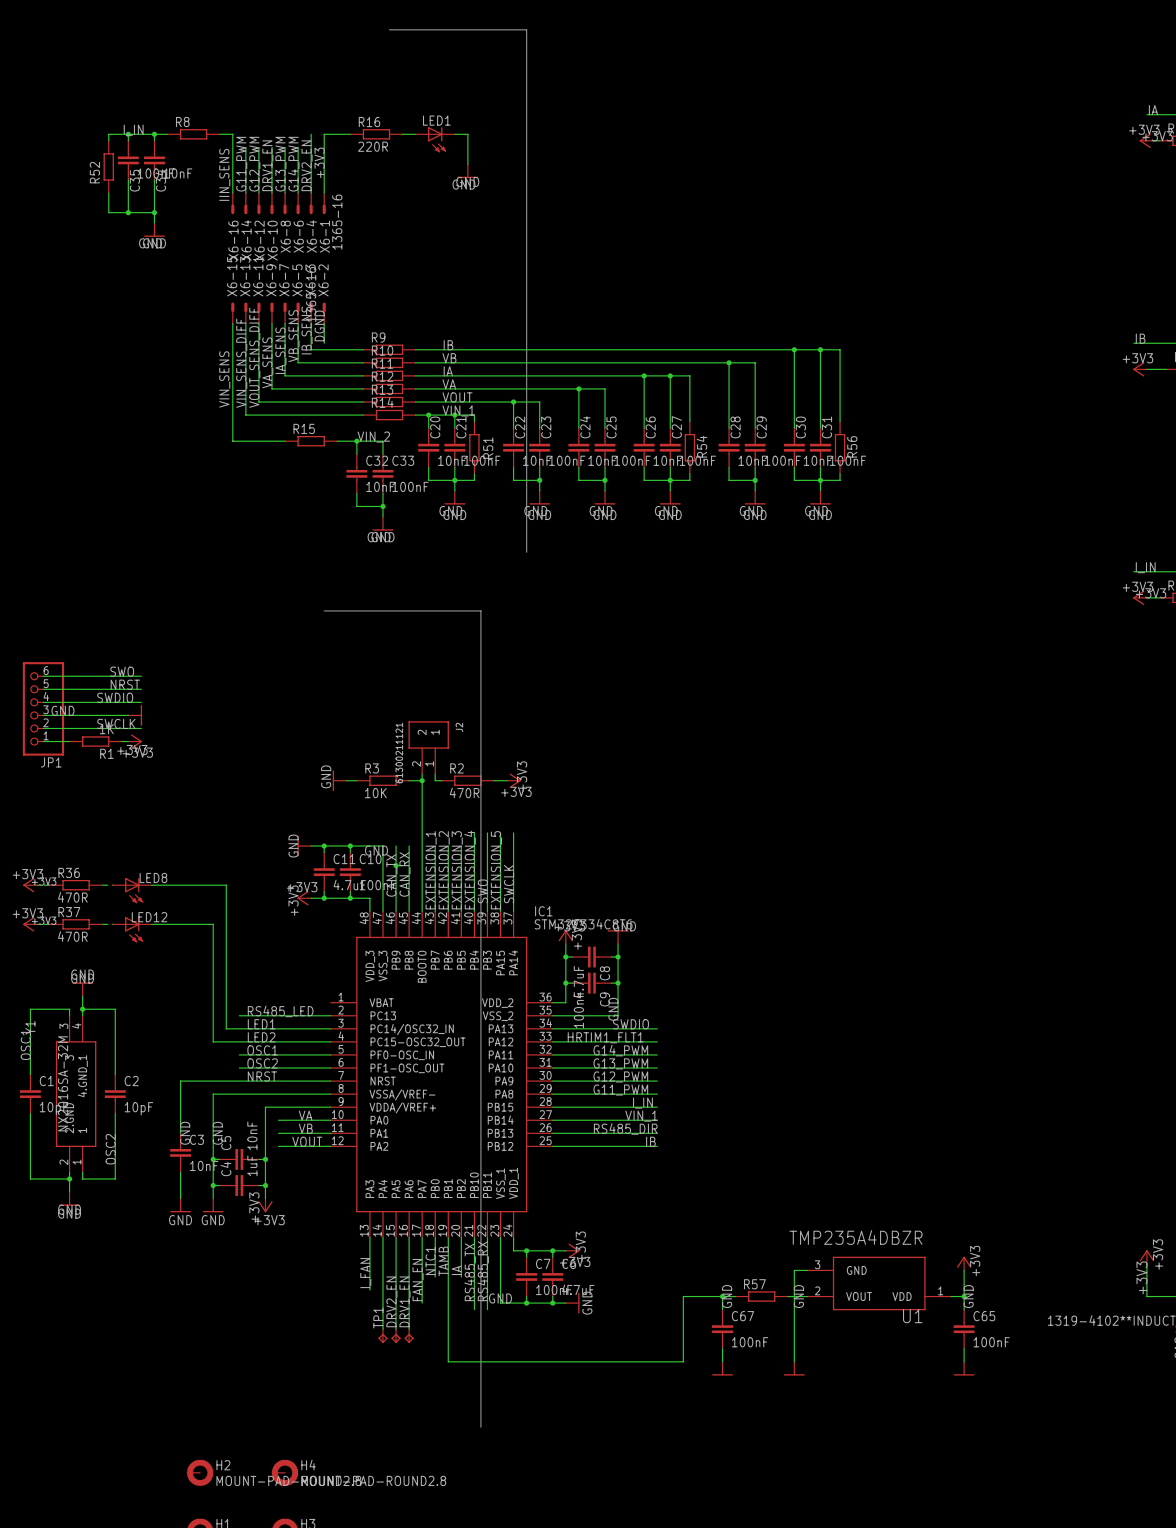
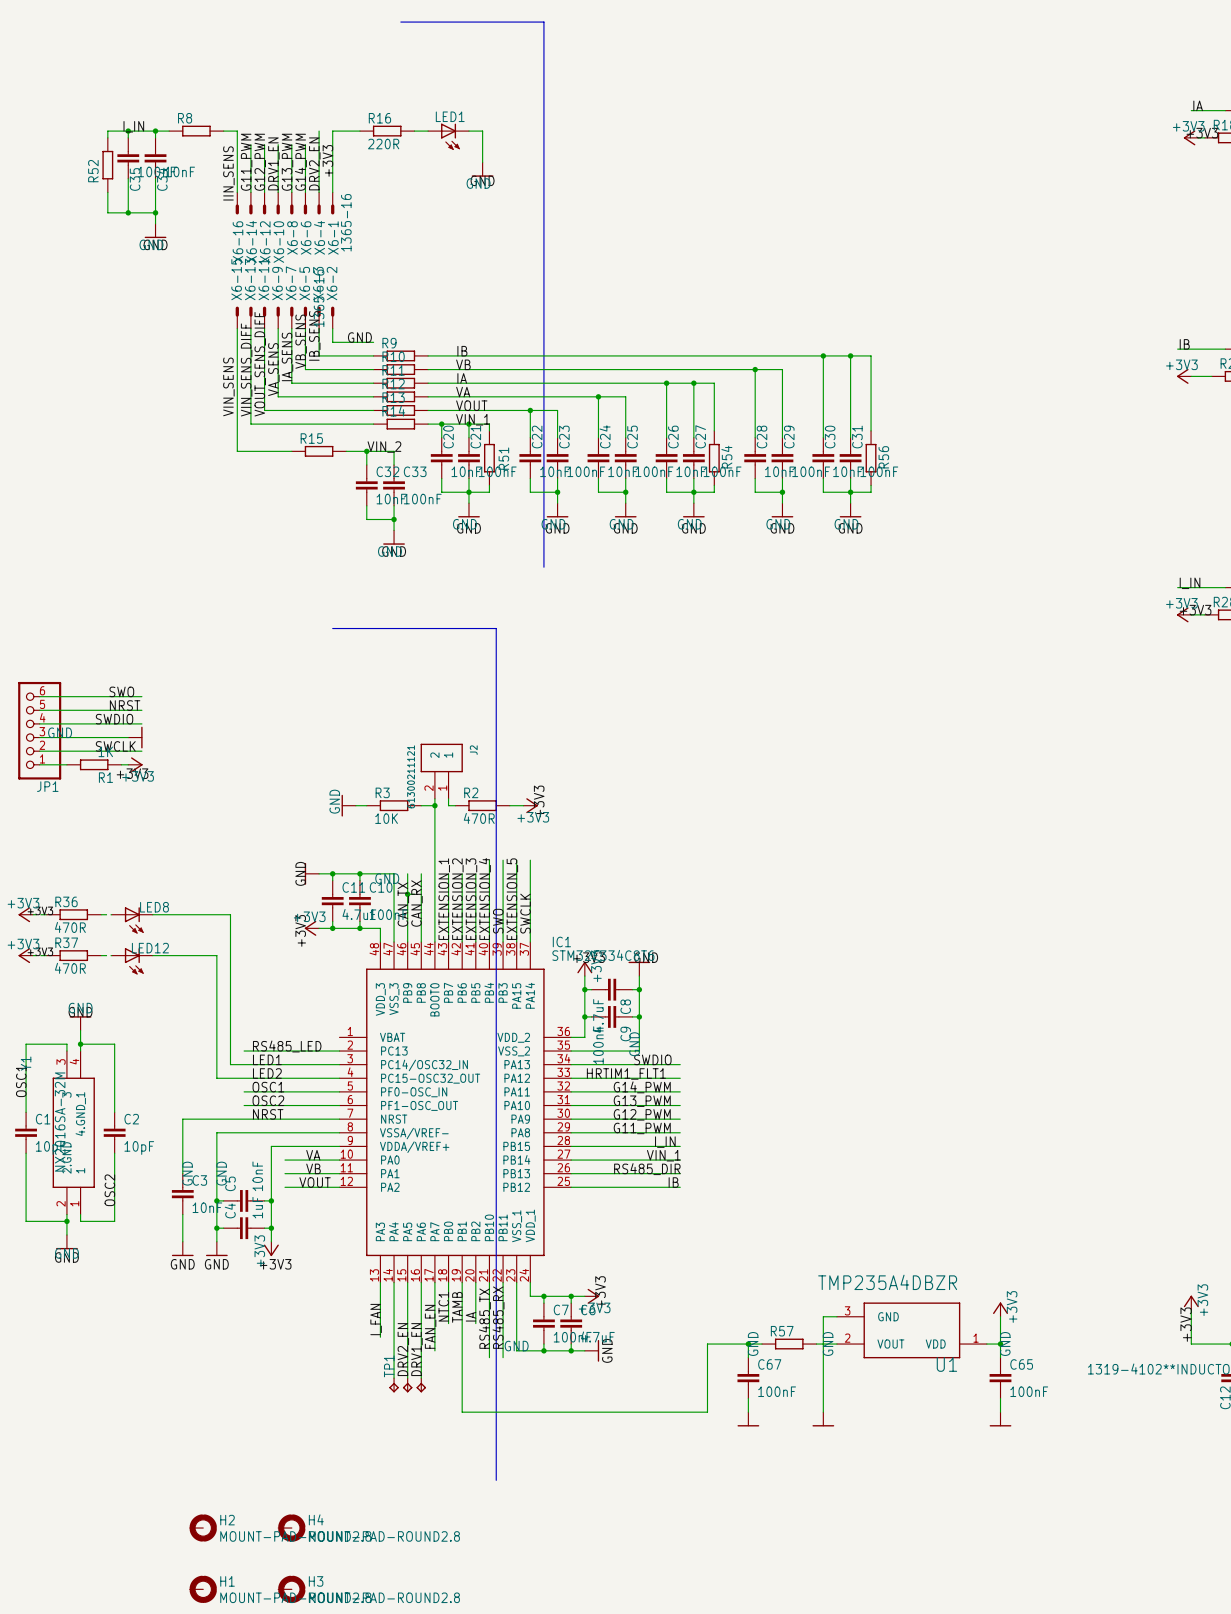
label: DGND (319, 325) -> none
label: none -> GND (359, 337)
wire: (324, 336) (324, 343) -> (332, 342) (373, 342)

